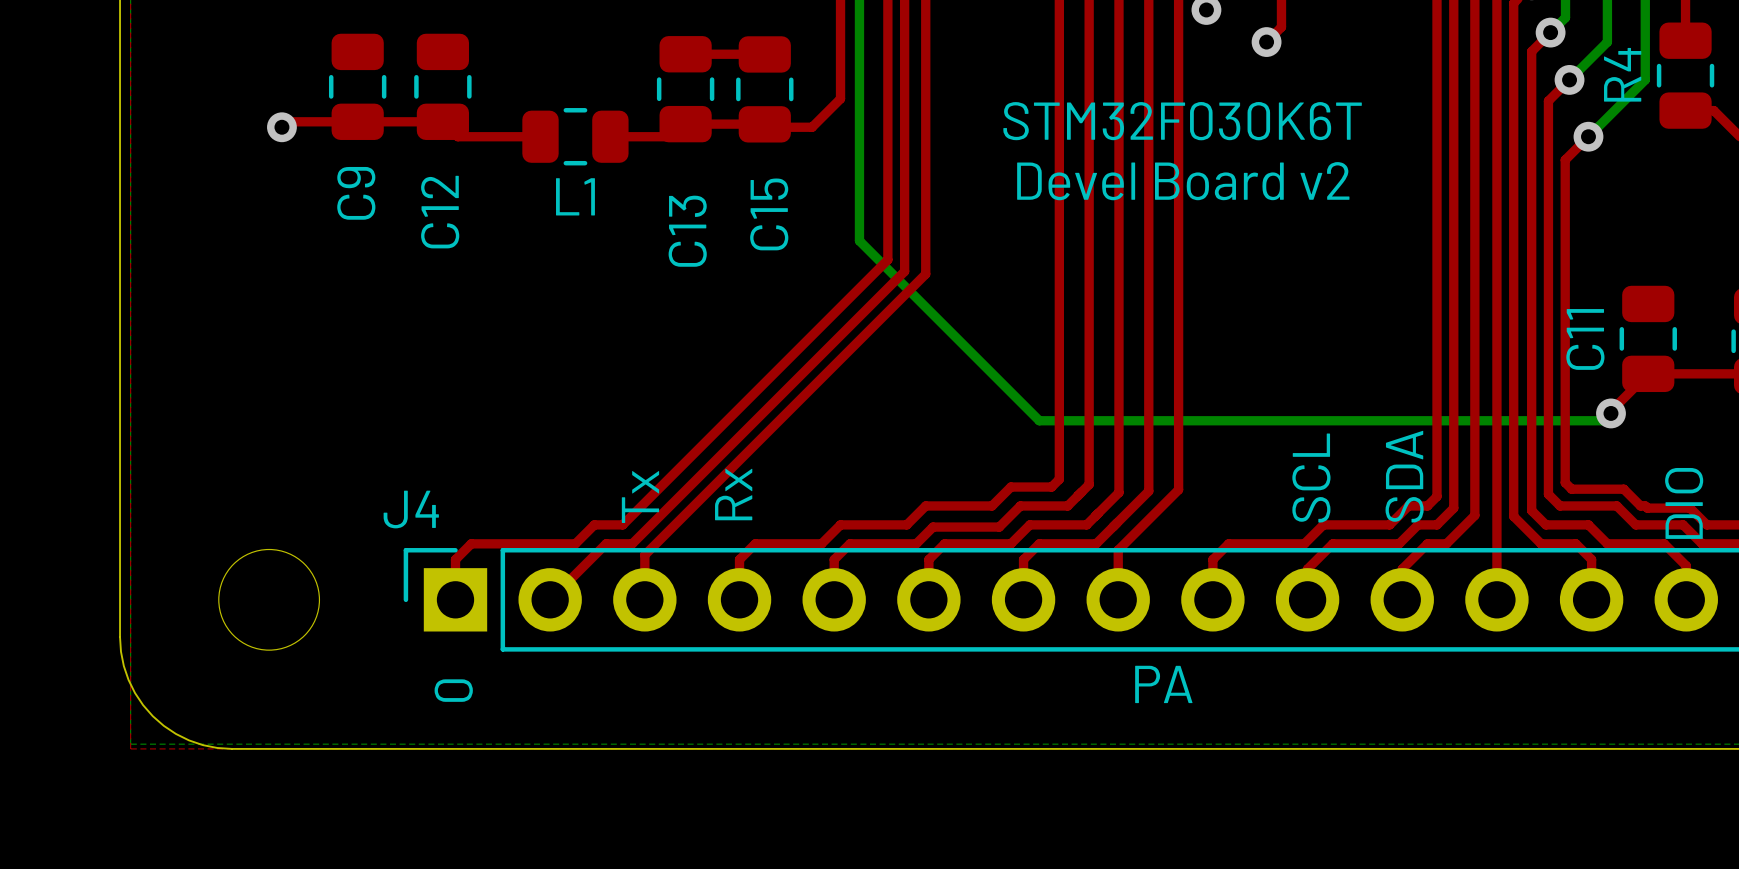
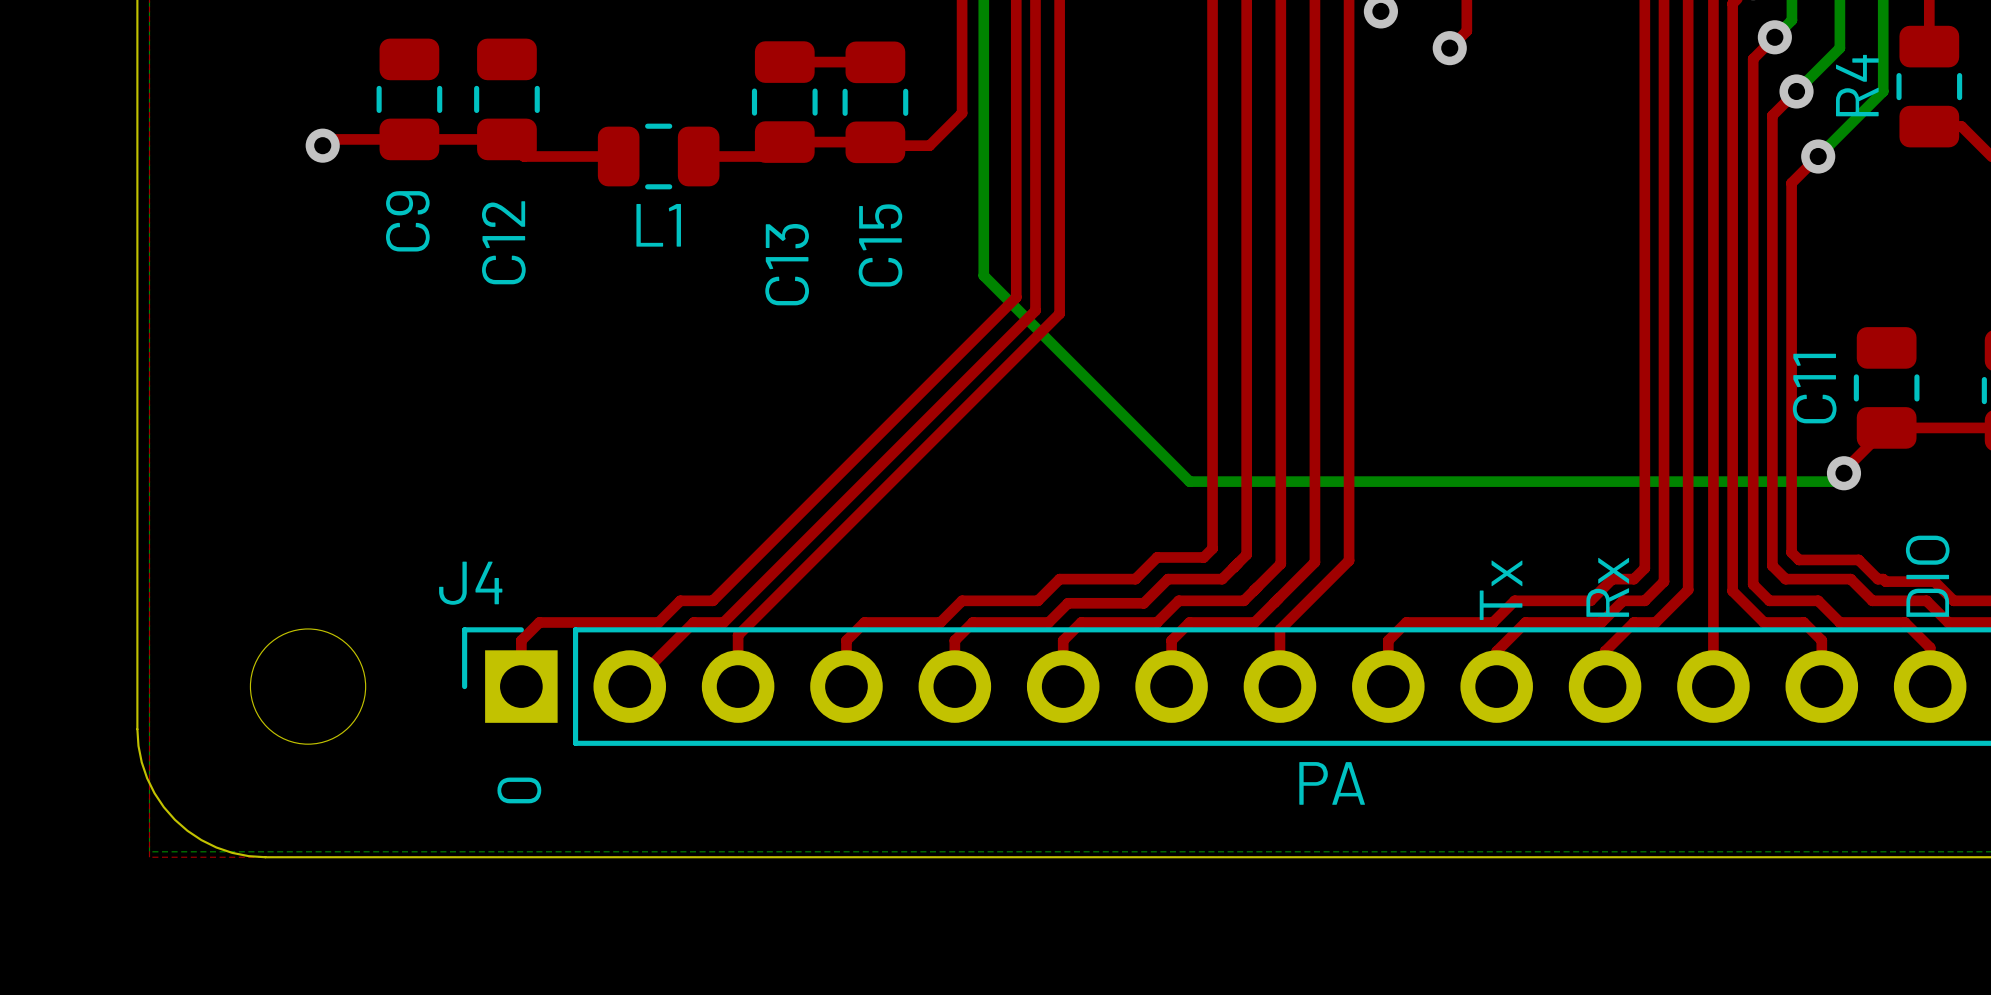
text: STM32F030K6T (1182, 121) -> none
text: Devel Board v2 (1183, 181) -> none
text: SDA (1404, 476) -> Rx (1607, 587)
text: SCL (1311, 478) -> Tx (1501, 590)
text: Rx (733, 494) -> none
text: Tx (640, 496) -> none

